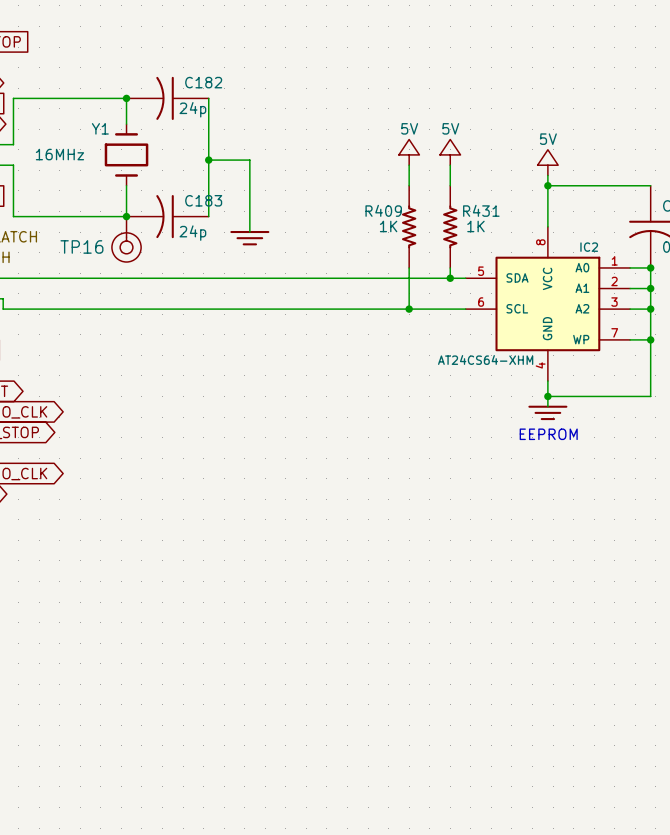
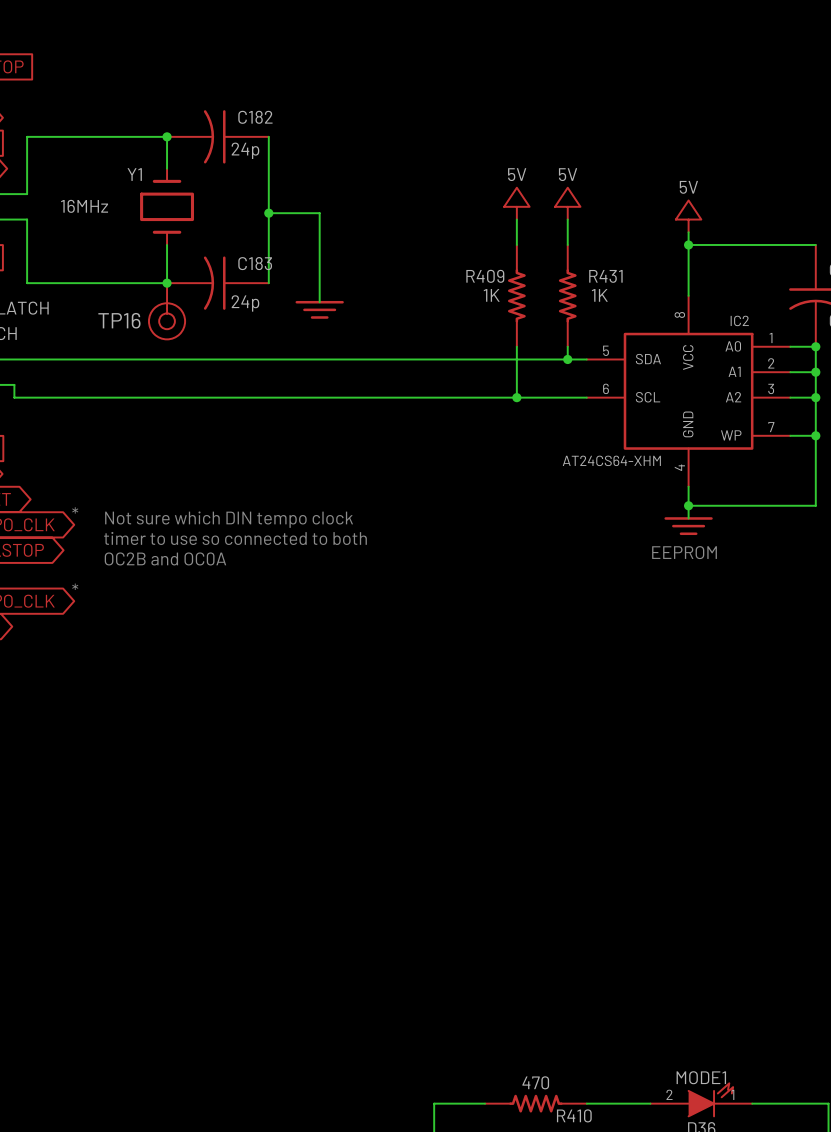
text: none -> * (75, 510)
text: none -> Not sure which DIN tempo clock (229, 519)
text: none -> timer to use so connected to both (235, 538)
text: none -> OC2B and OC0A (165, 558)
text: none -> * (75, 586)

